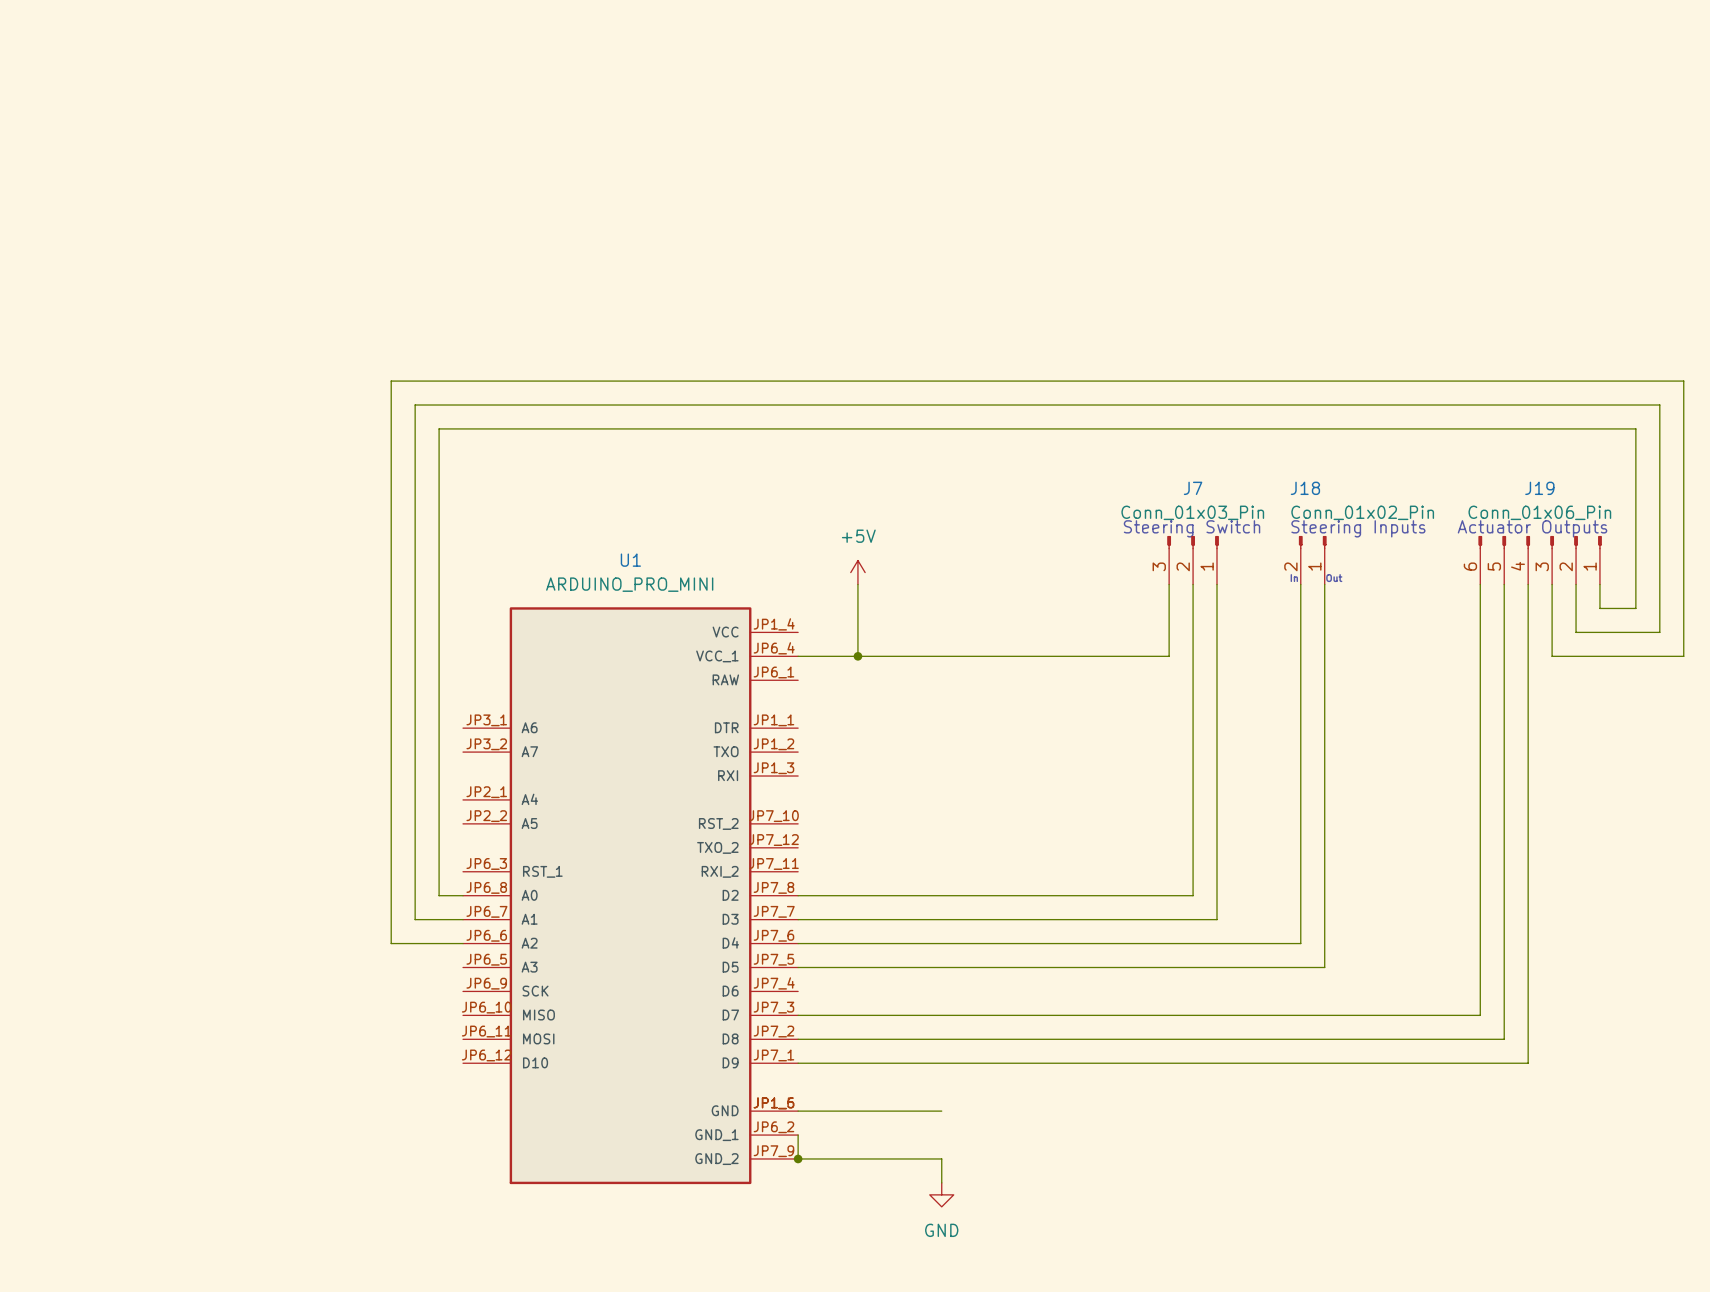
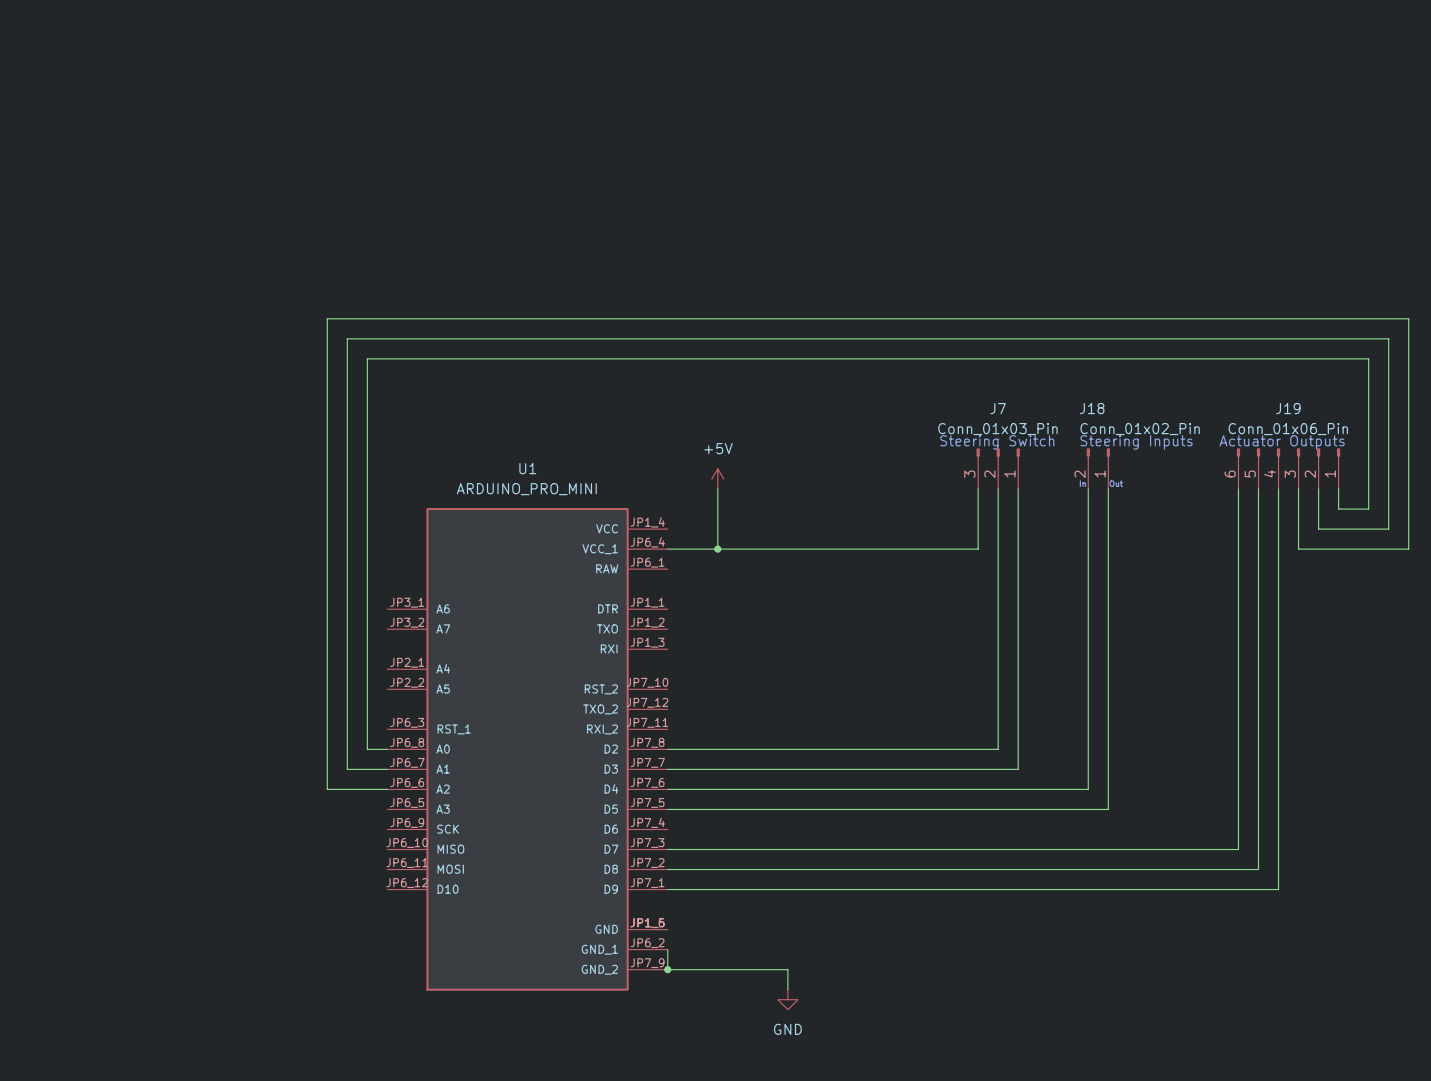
wire: (798, 1111) (941, 1111) -> none

